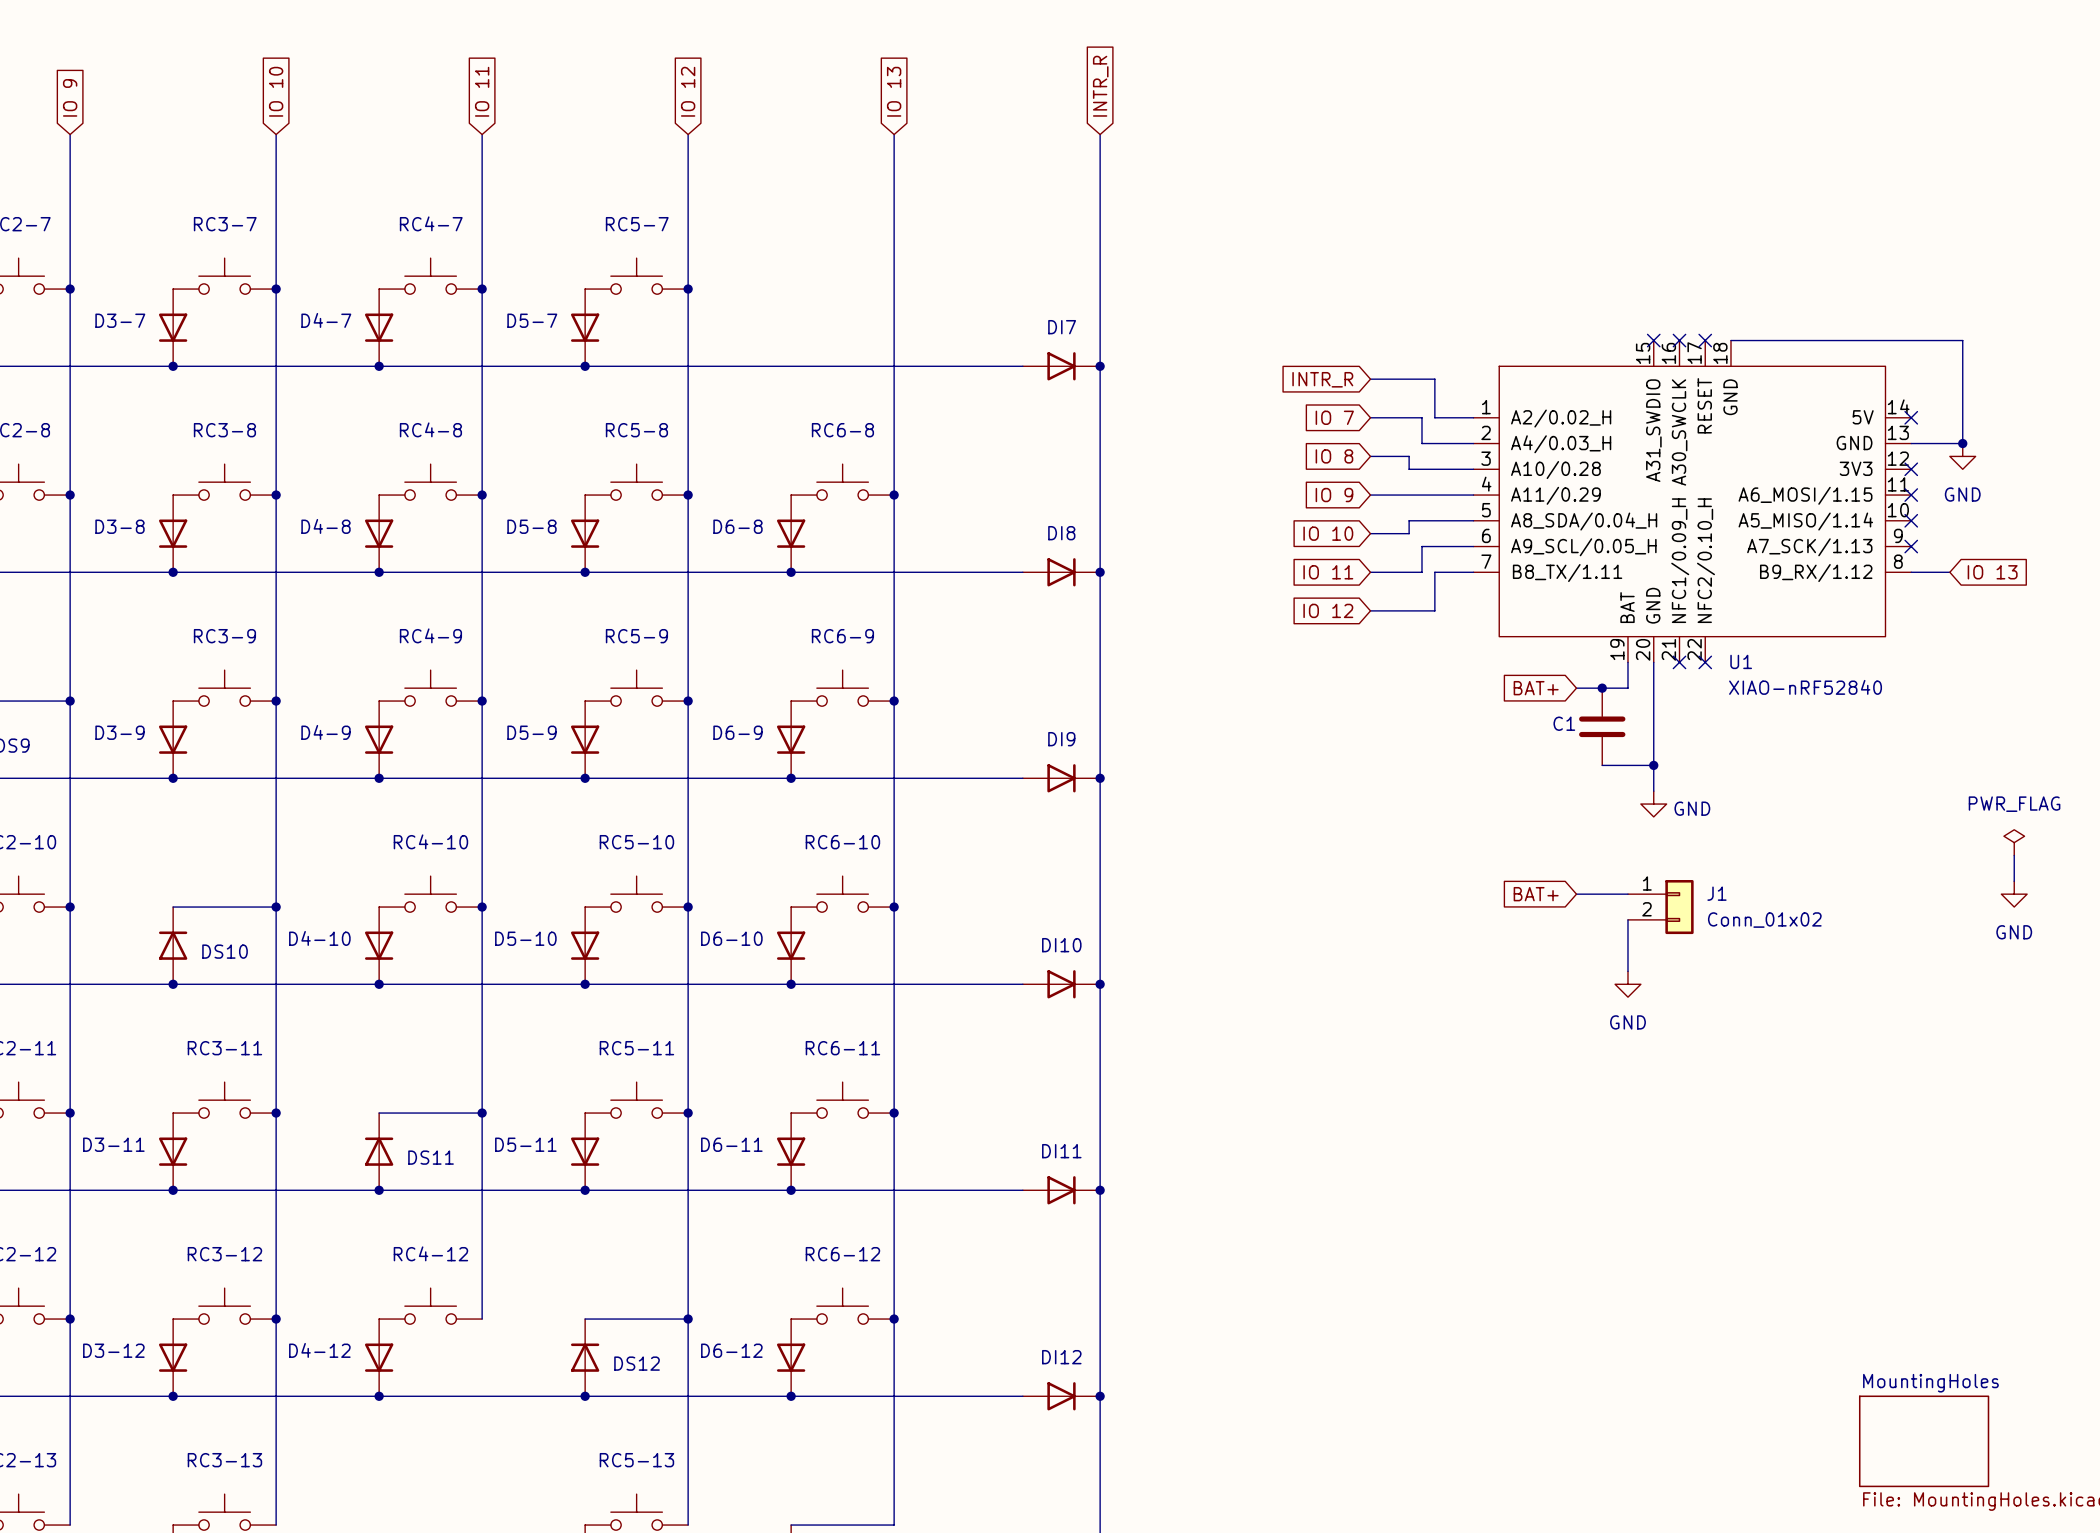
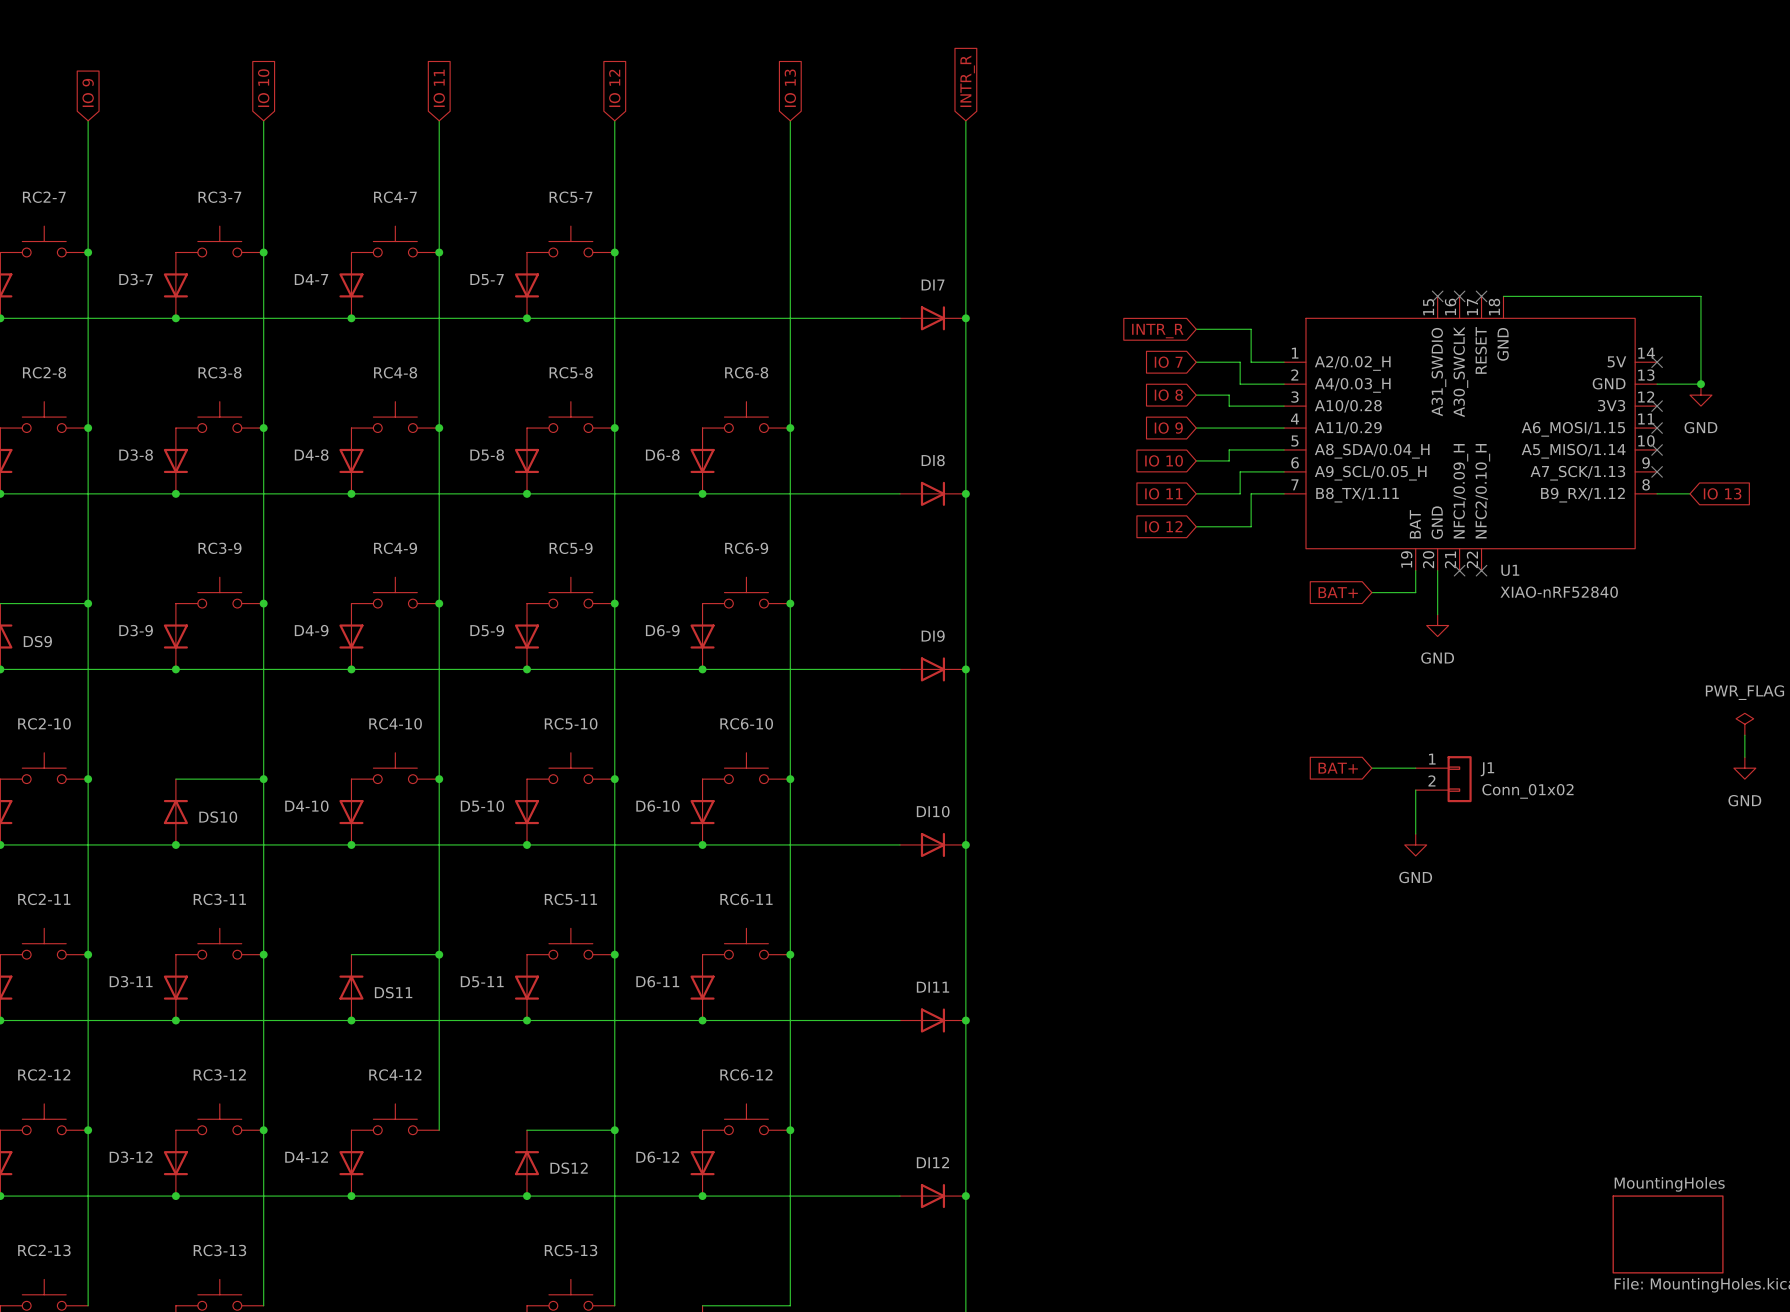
junction: (1602, 688) -> none
wire: (1653, 713) (1653, 791) -> none
C1: (1602, 726) -> none
wire: (1602, 765) (1653, 765) -> none
junction: (1653, 765) -> none
power symbol position: GND (1653, 804) -> GND (1437, 625)
power symbol text position: GND (1692, 808) -> GND (1437, 658)

